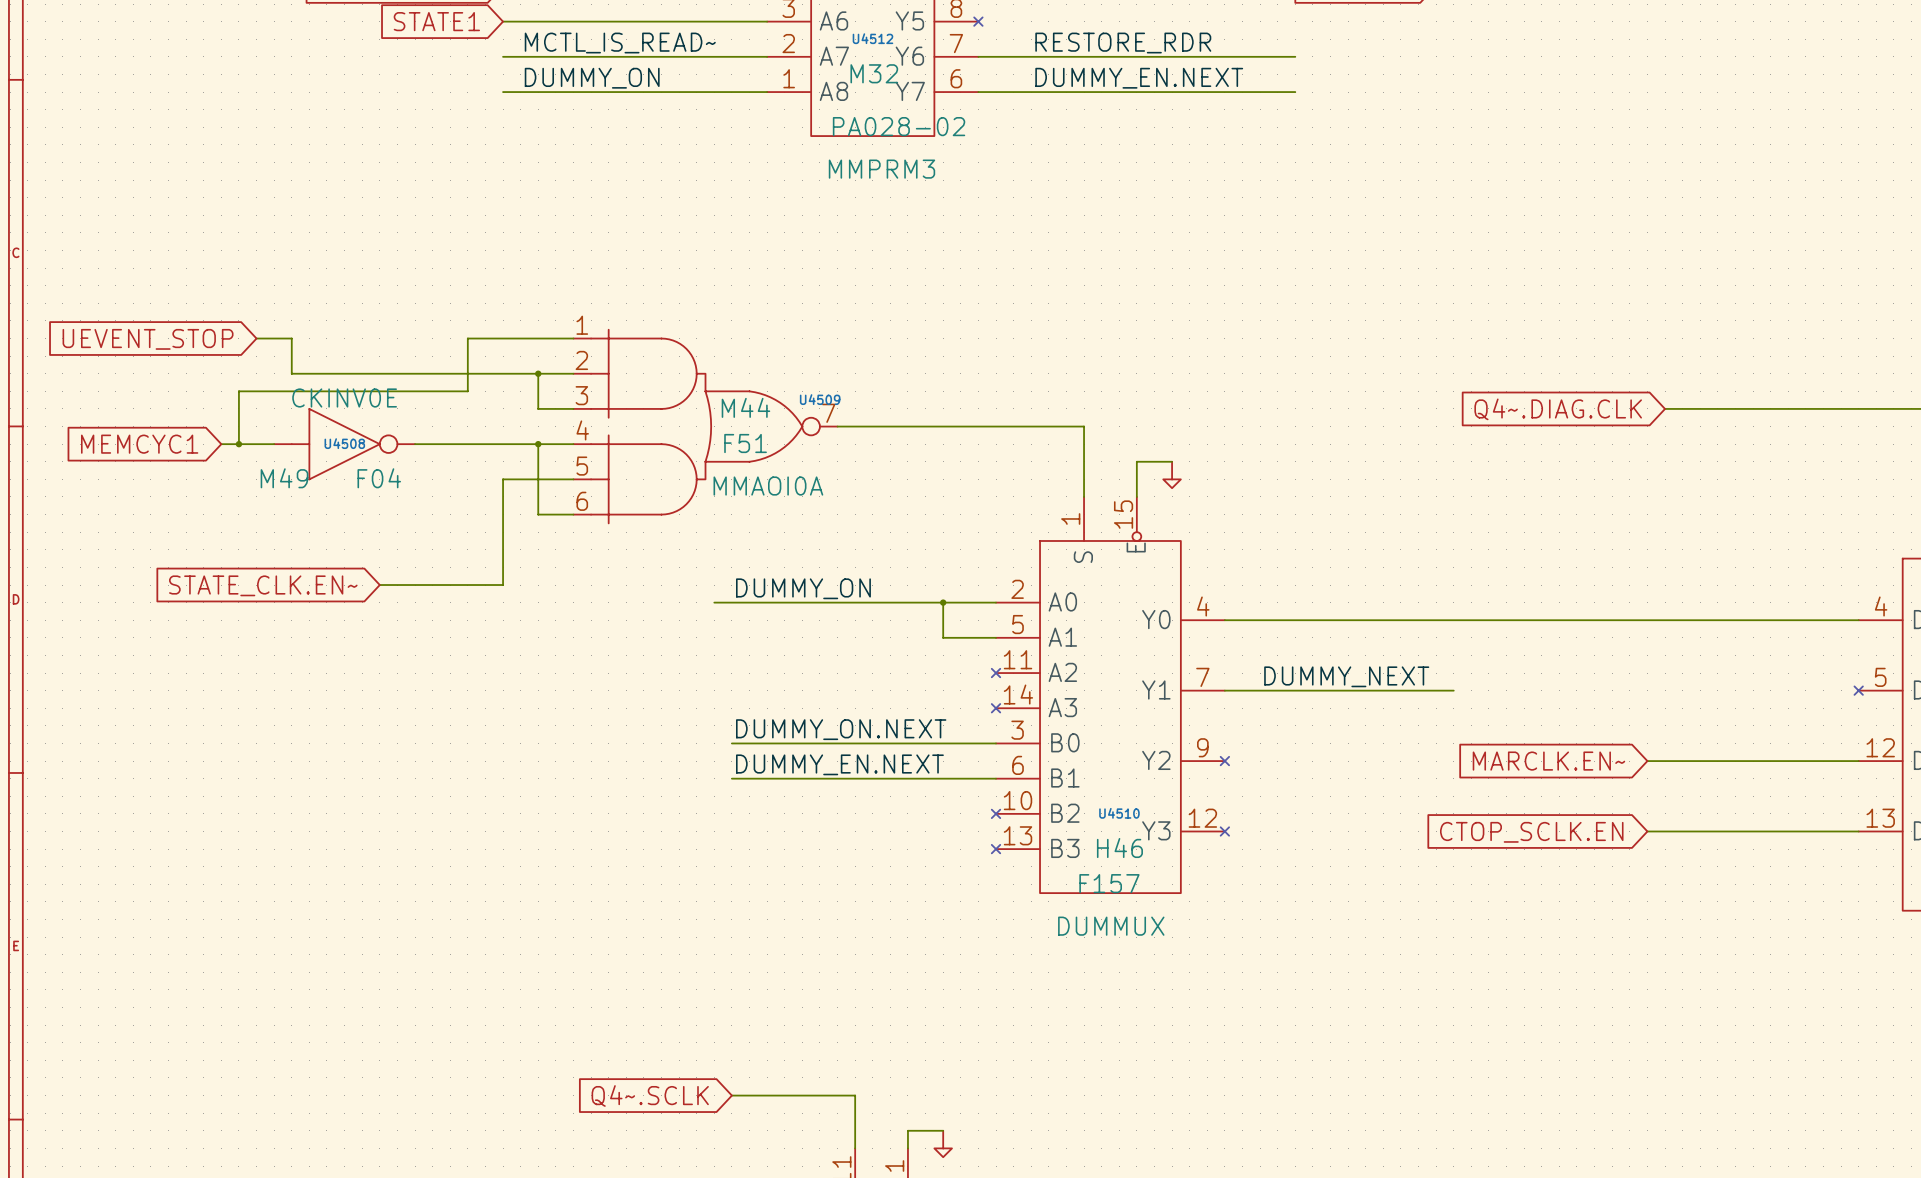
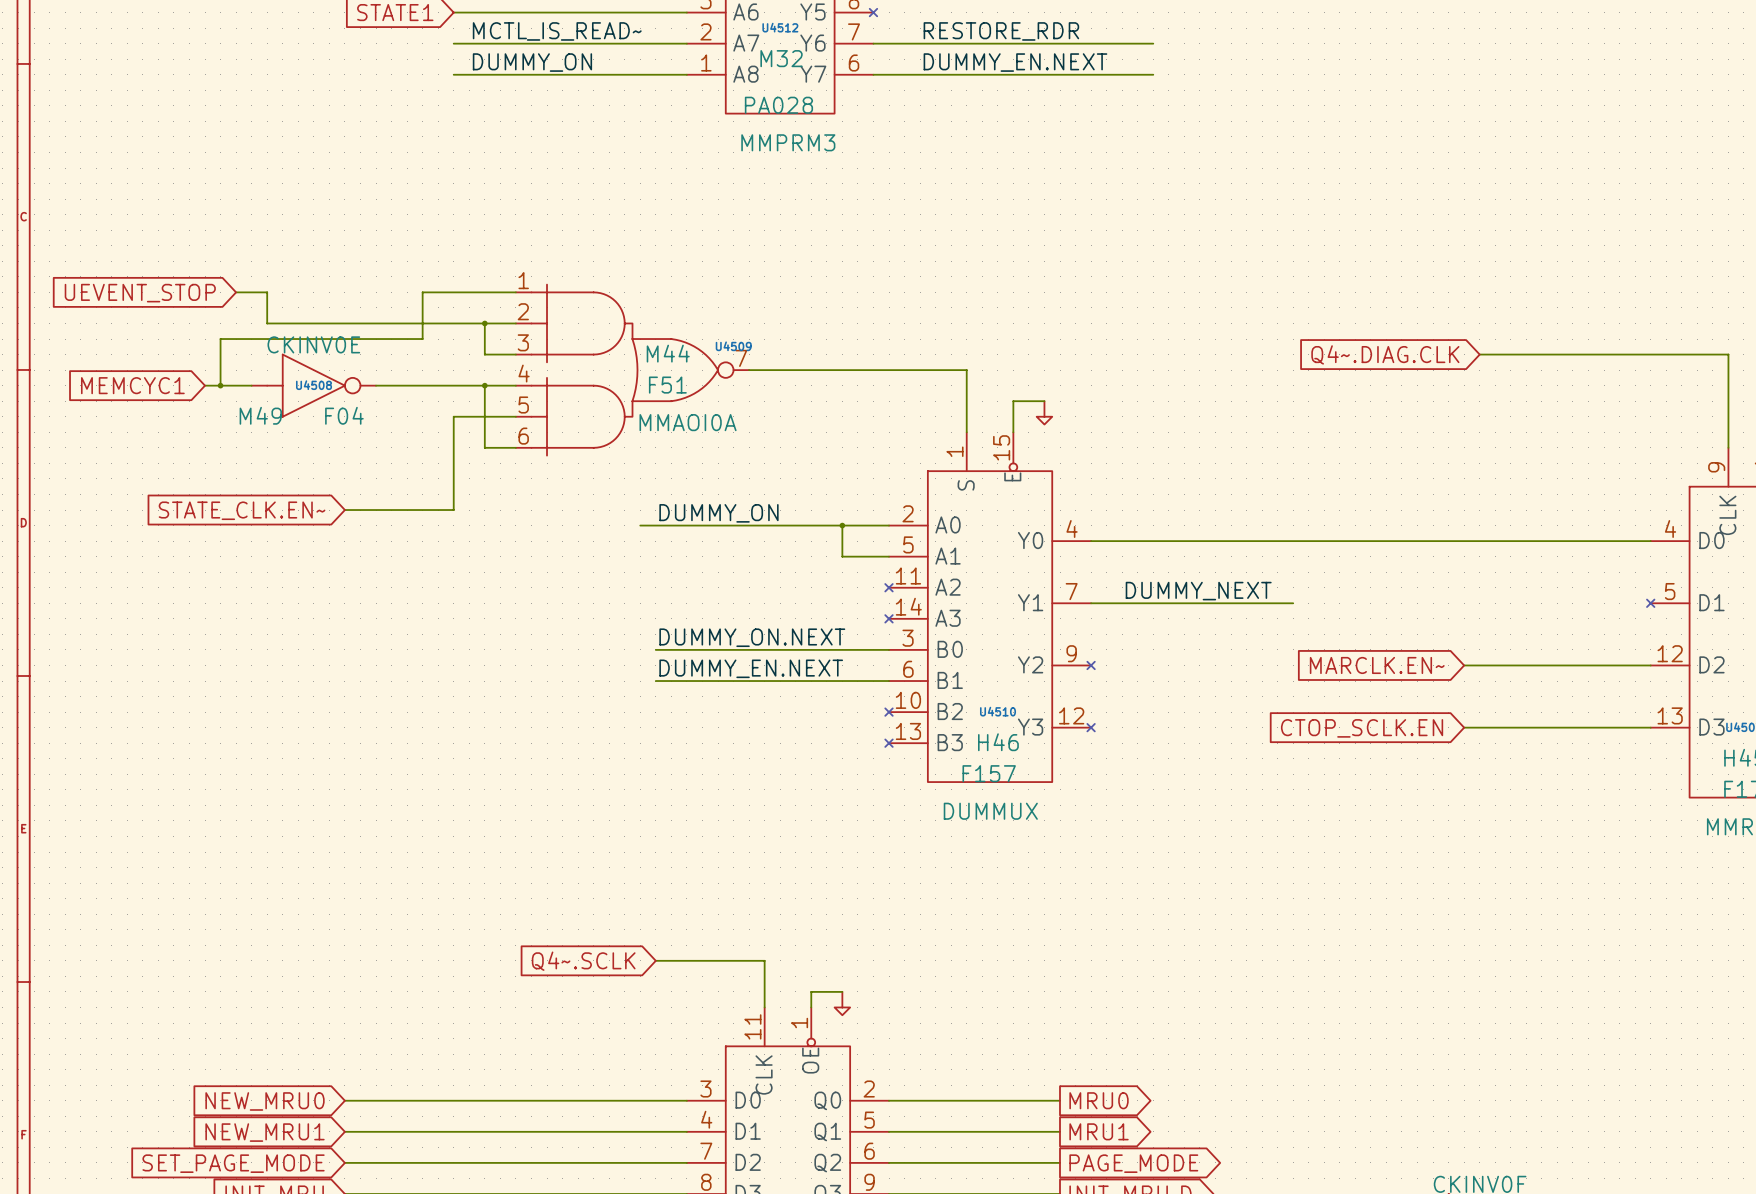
U4512 value: PA028-02 (899, 126) -> PA028 (778, 105)

